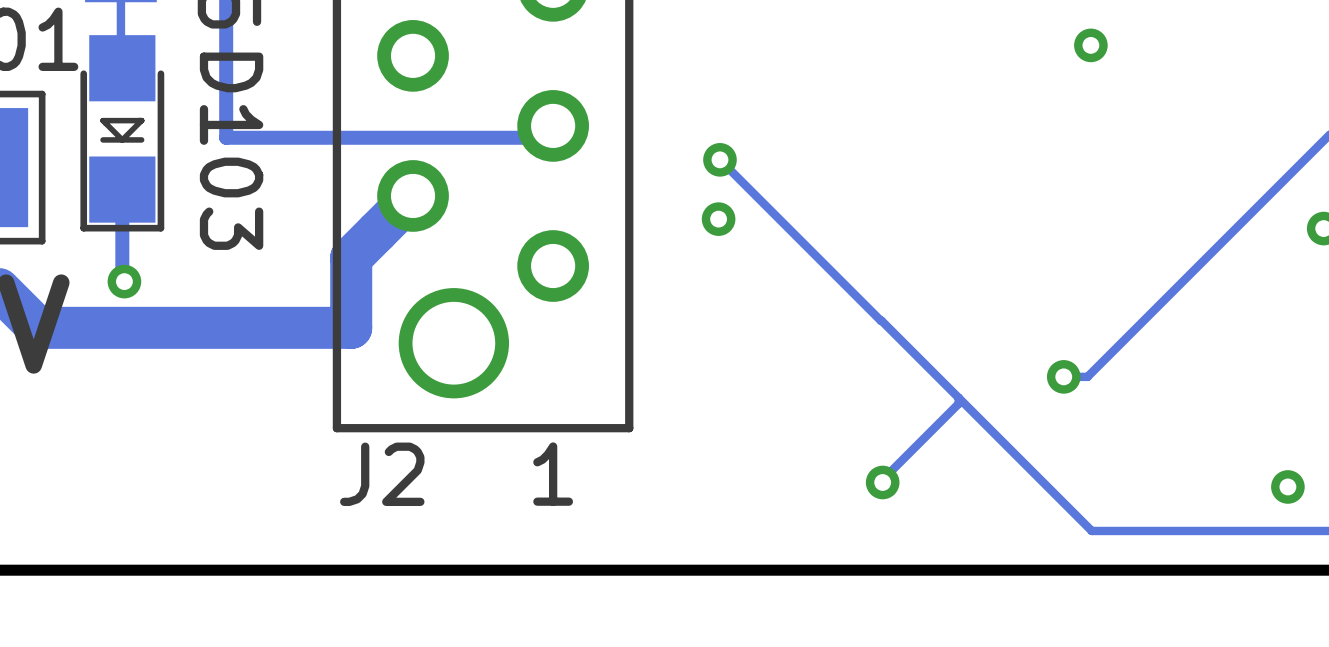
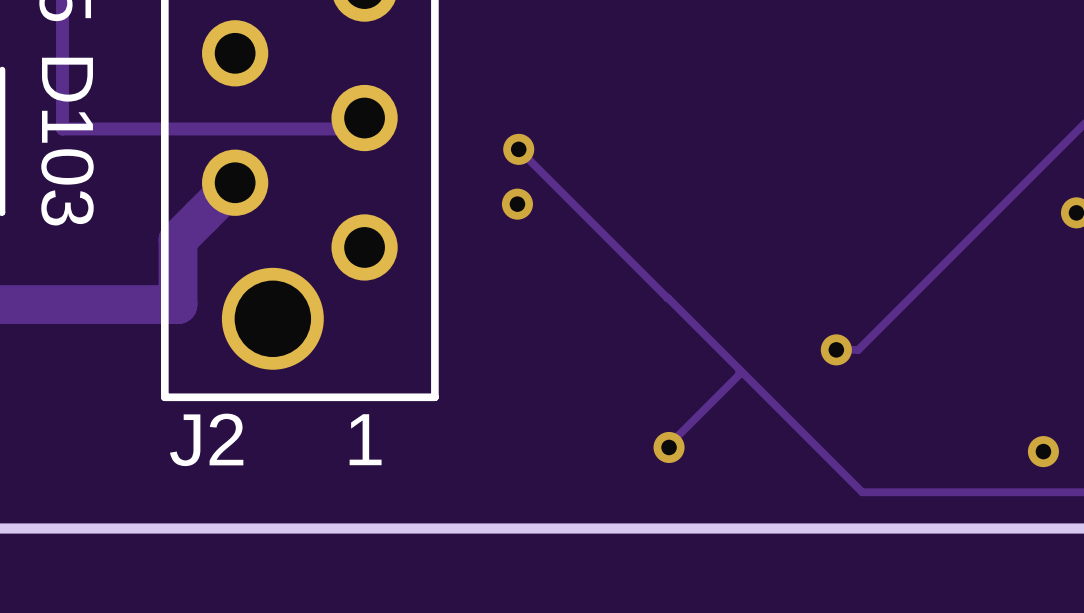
via: (1090, 45) -> none

